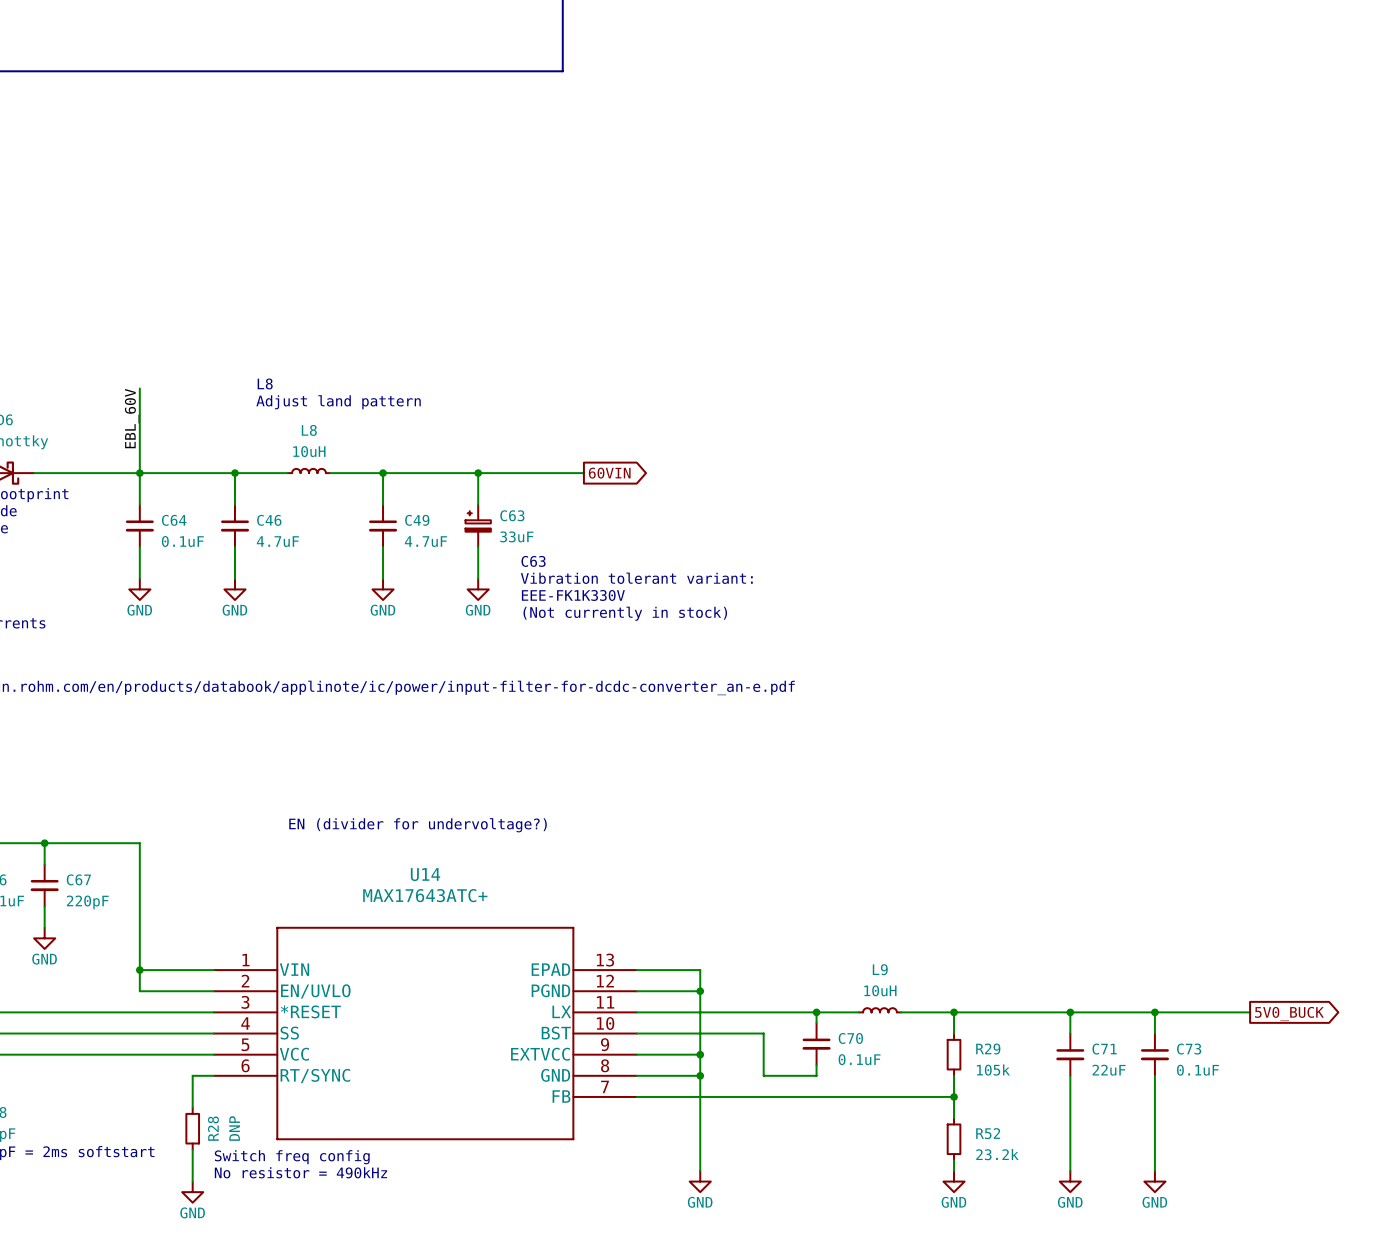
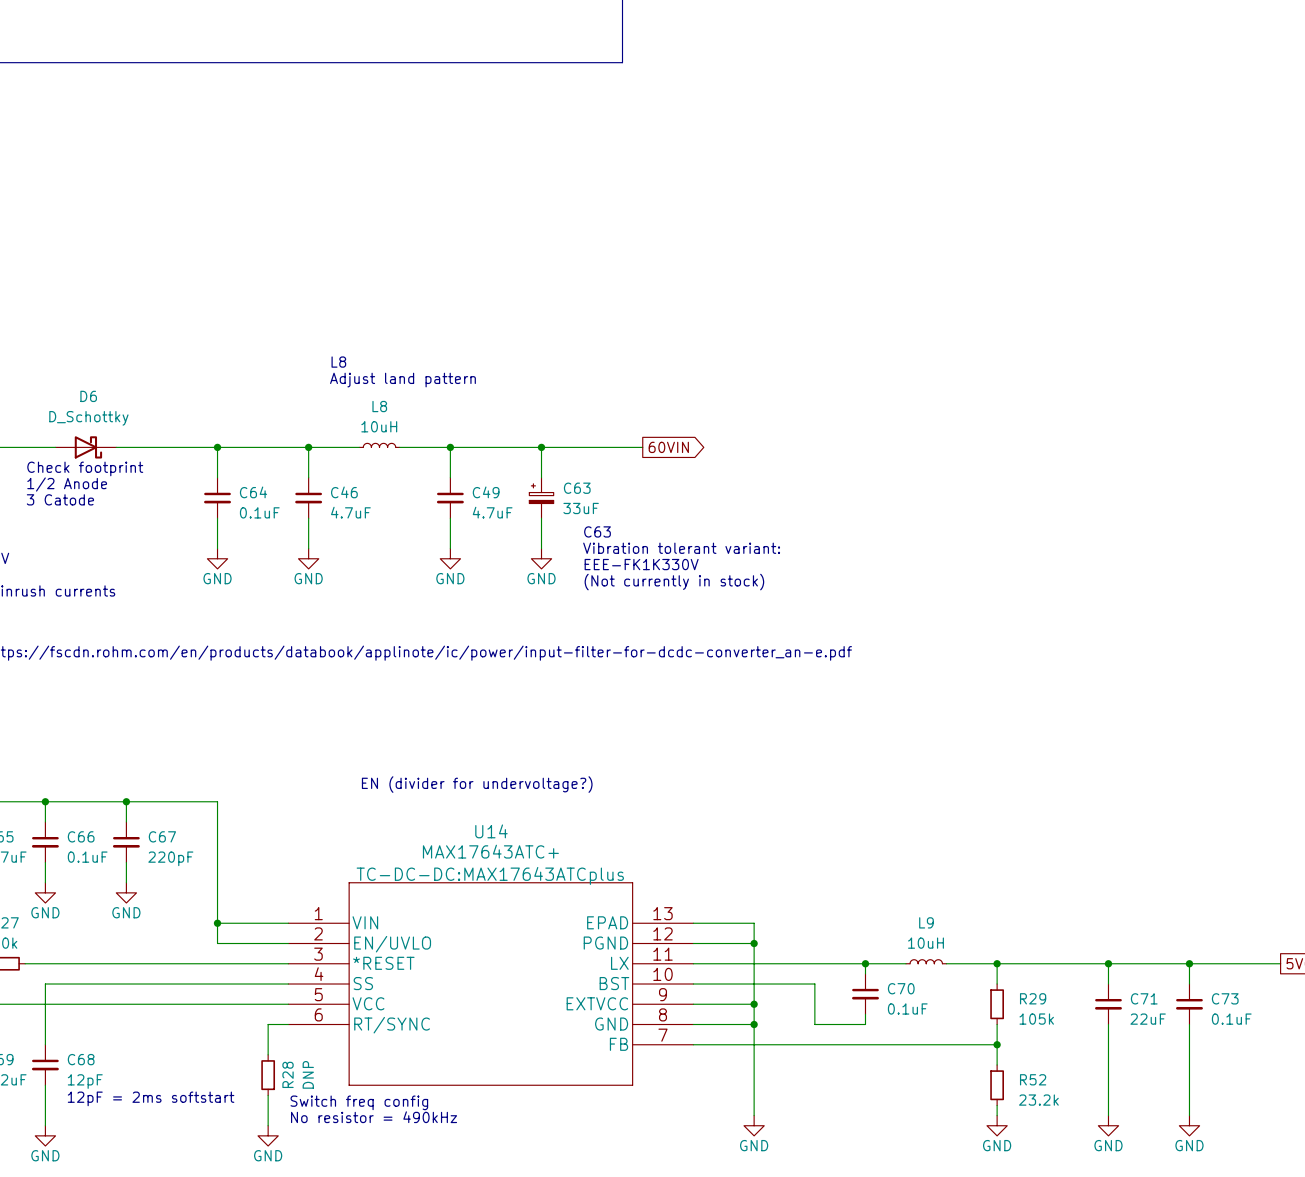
wire: (139, 388) (139, 473) -> none
label: EBL_60V (132, 418) -> none
U14 text: none -> TC-DC-DC:MAX17643ATCplus (490, 875)

